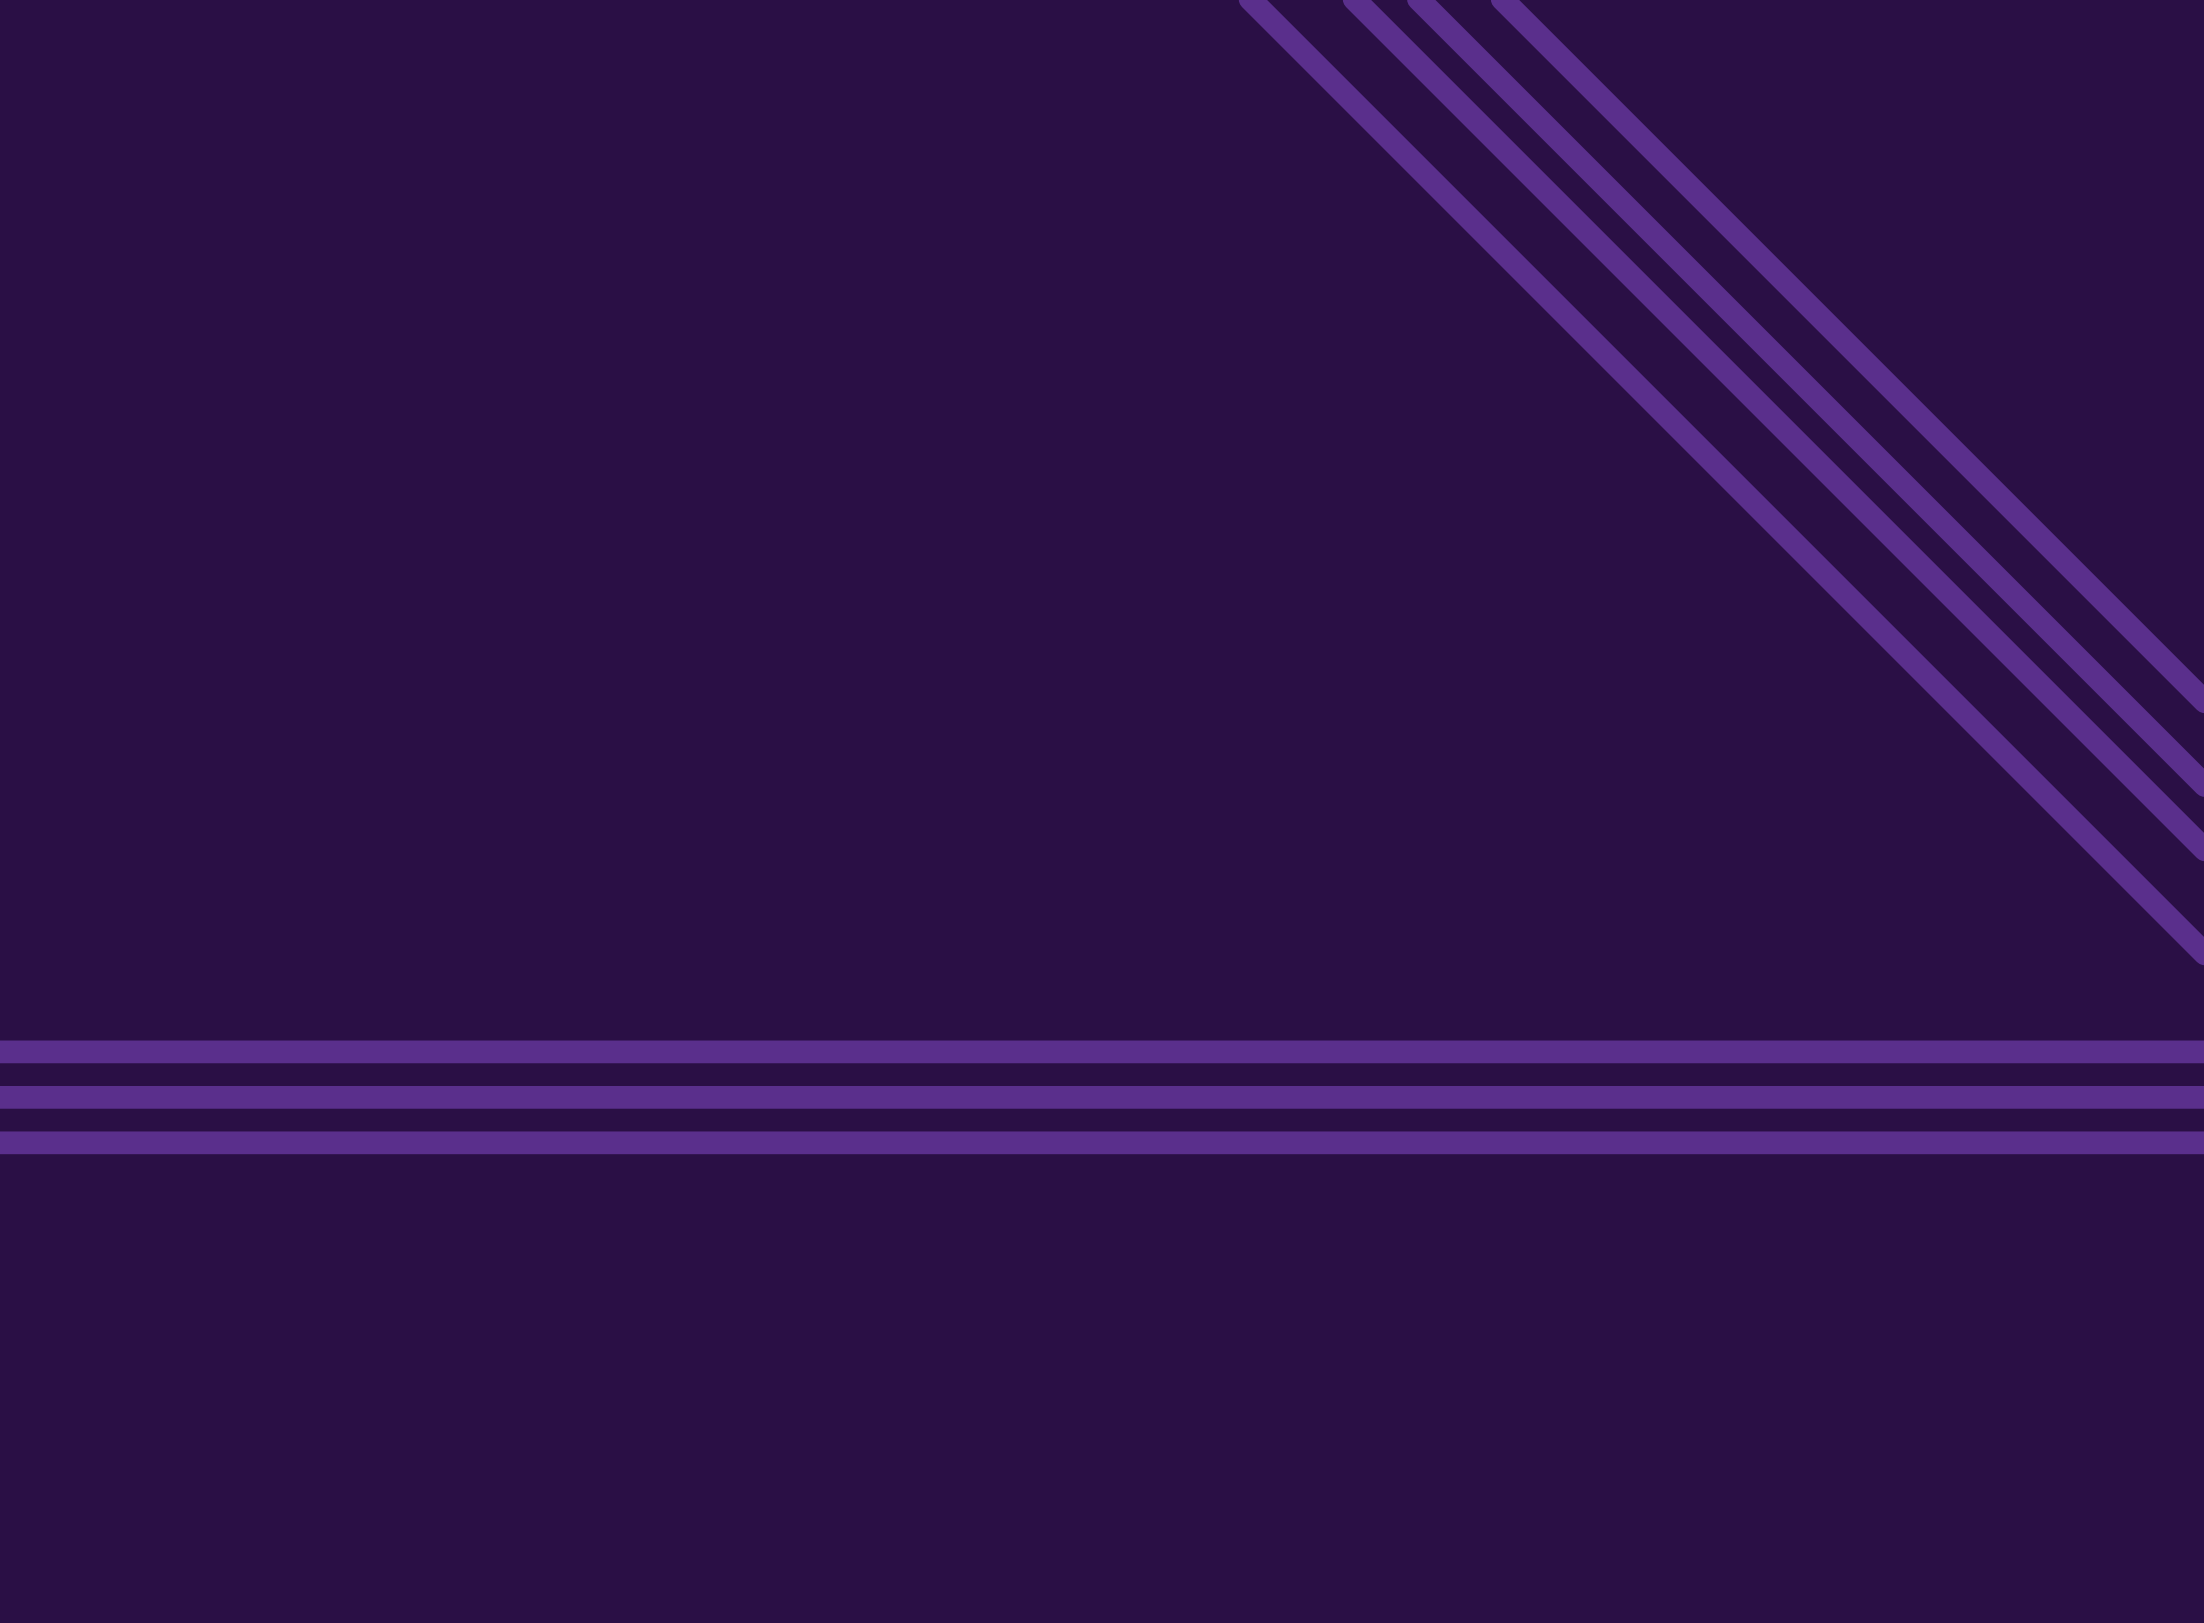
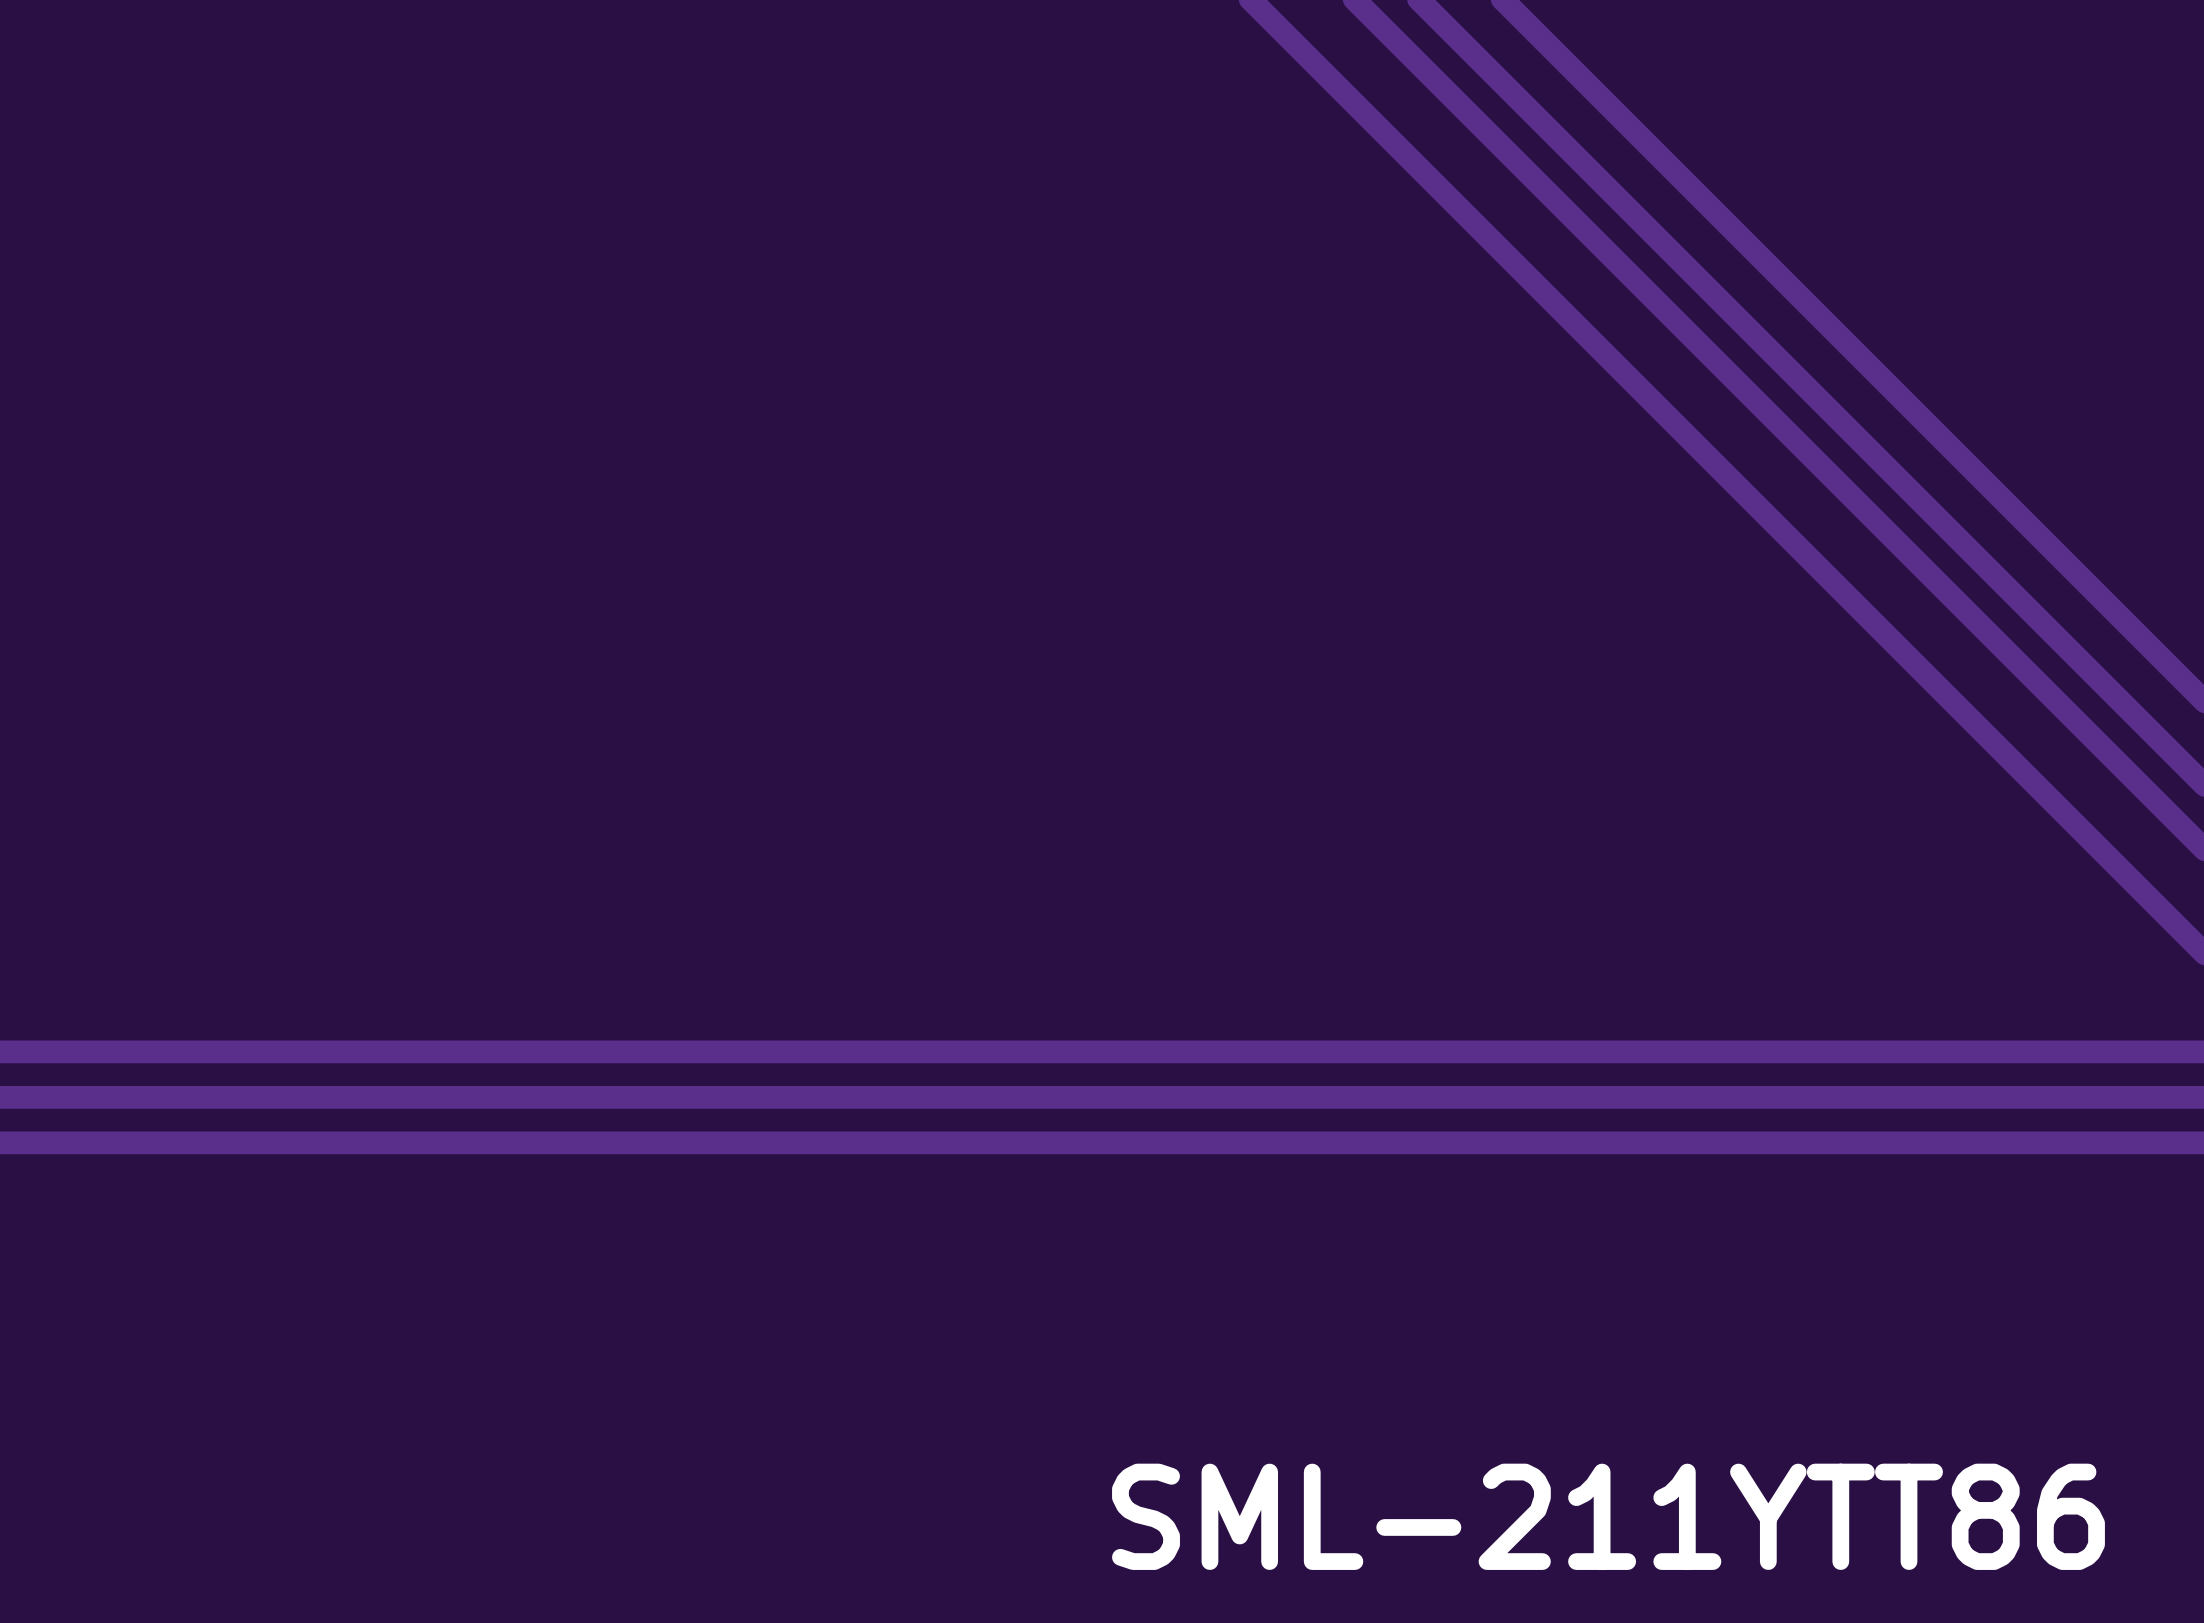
part value: none -> SML-211YTT86 (1608, 1516)

